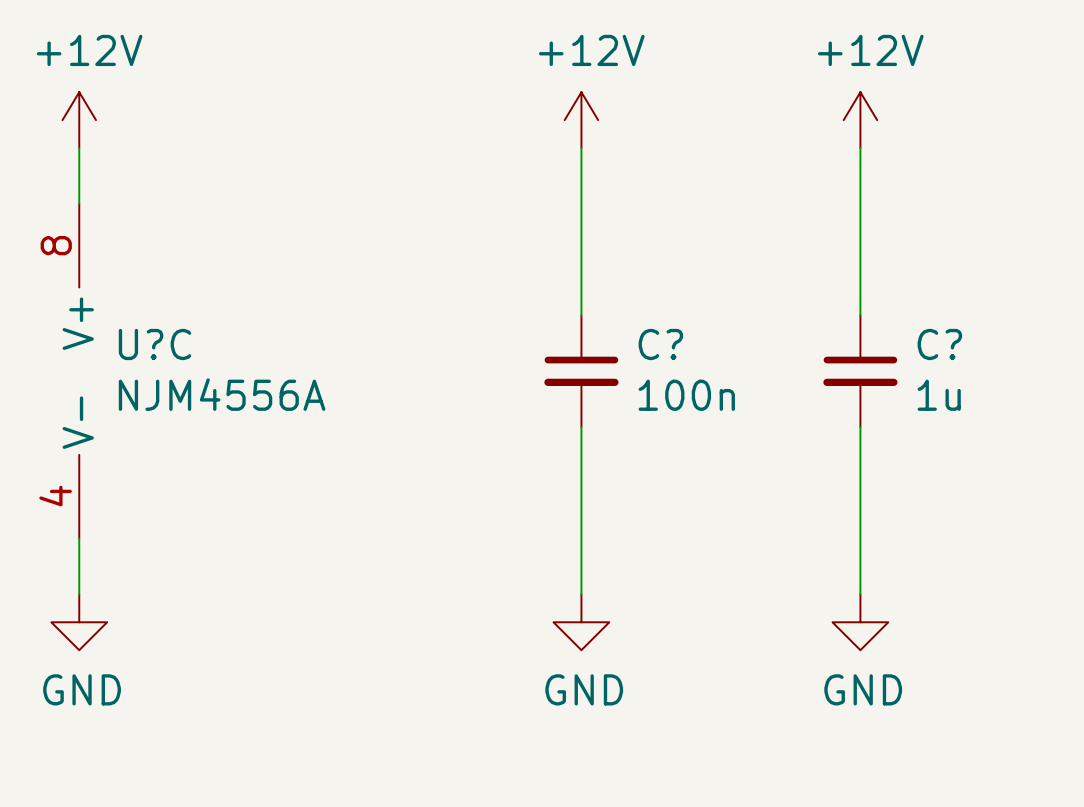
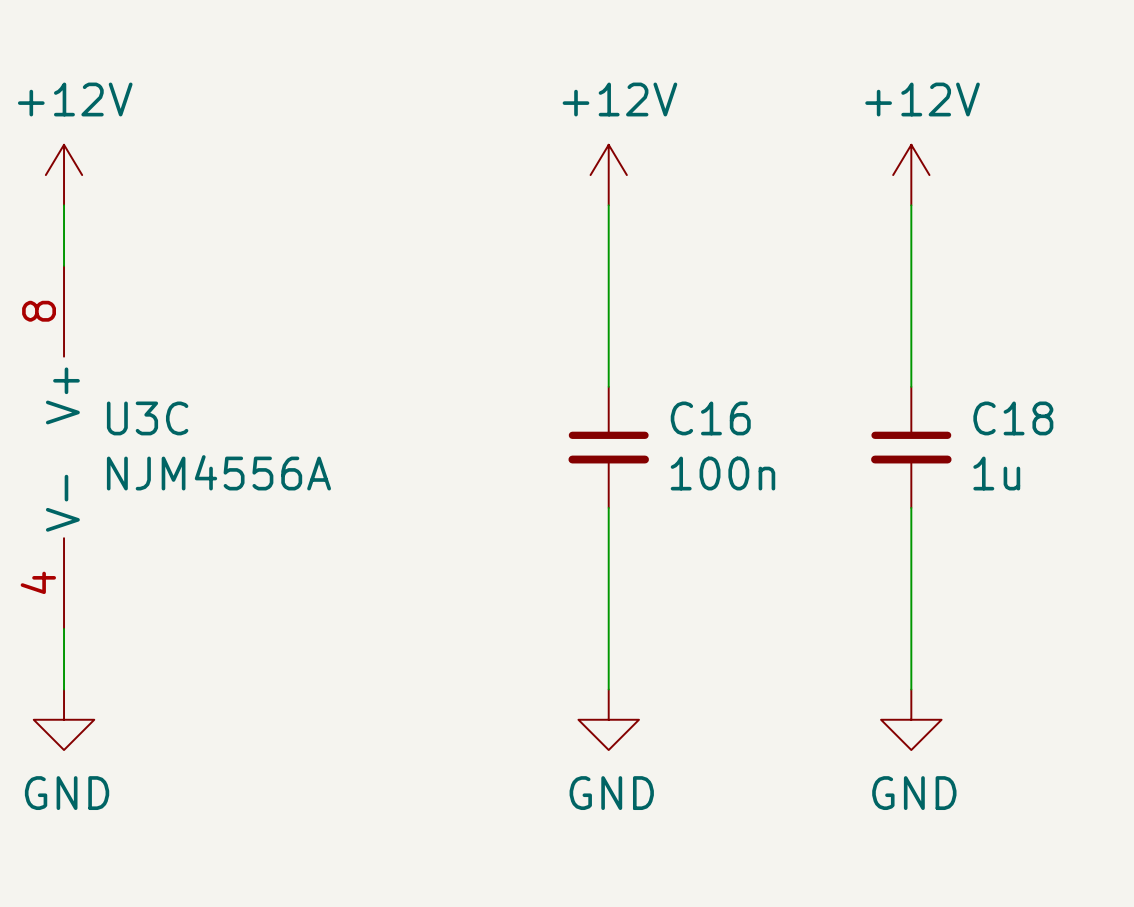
U?C name: U?C (155, 344) -> U3C (147, 418)
C? name: C? (660, 344) -> C16 (710, 418)
C? name: C? (939, 344) -> C18 (1013, 418)

